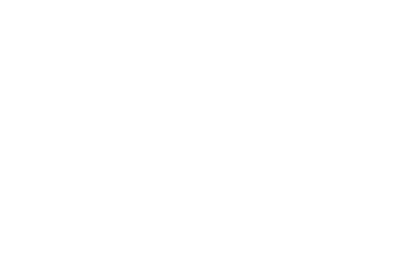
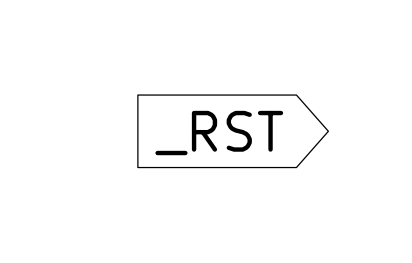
global label: none -> _RST (219, 133)

